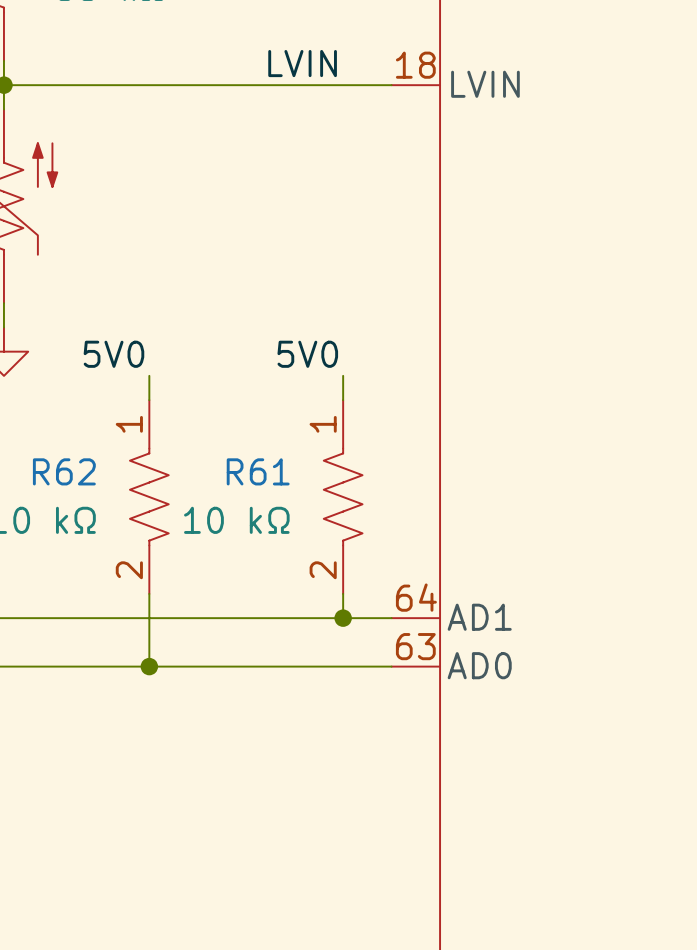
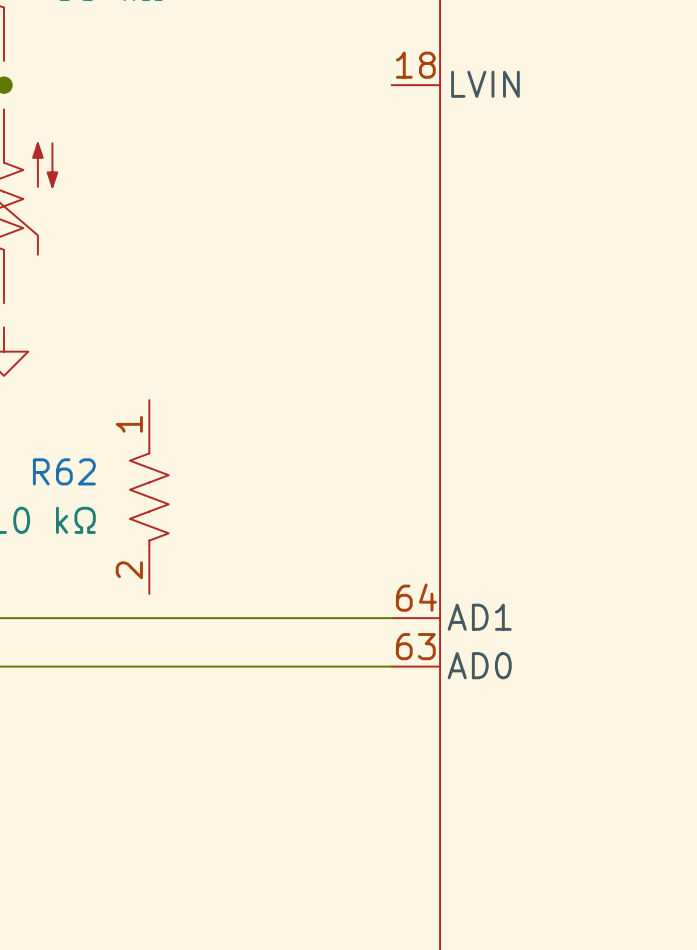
wire: (3, 60) (3, 109) -> none
label: LVIN (302, 63) -> none
wire: (3, 85) (391, 85) -> none
wire: (3, 303) (3, 327) -> none
label: 5V0 (113, 354) -> none
label: 5V0 (307, 354) -> none
wire: (149, 375) (149, 400) -> none
wire: (343, 375) (343, 400) -> none
R61: 10 kΩ (343, 497) -> none
wire: (149, 593) (149, 666) -> none
wire: (343, 593) (343, 618) -> none
junction: (343, 618) -> none
junction: (149, 666) -> none

